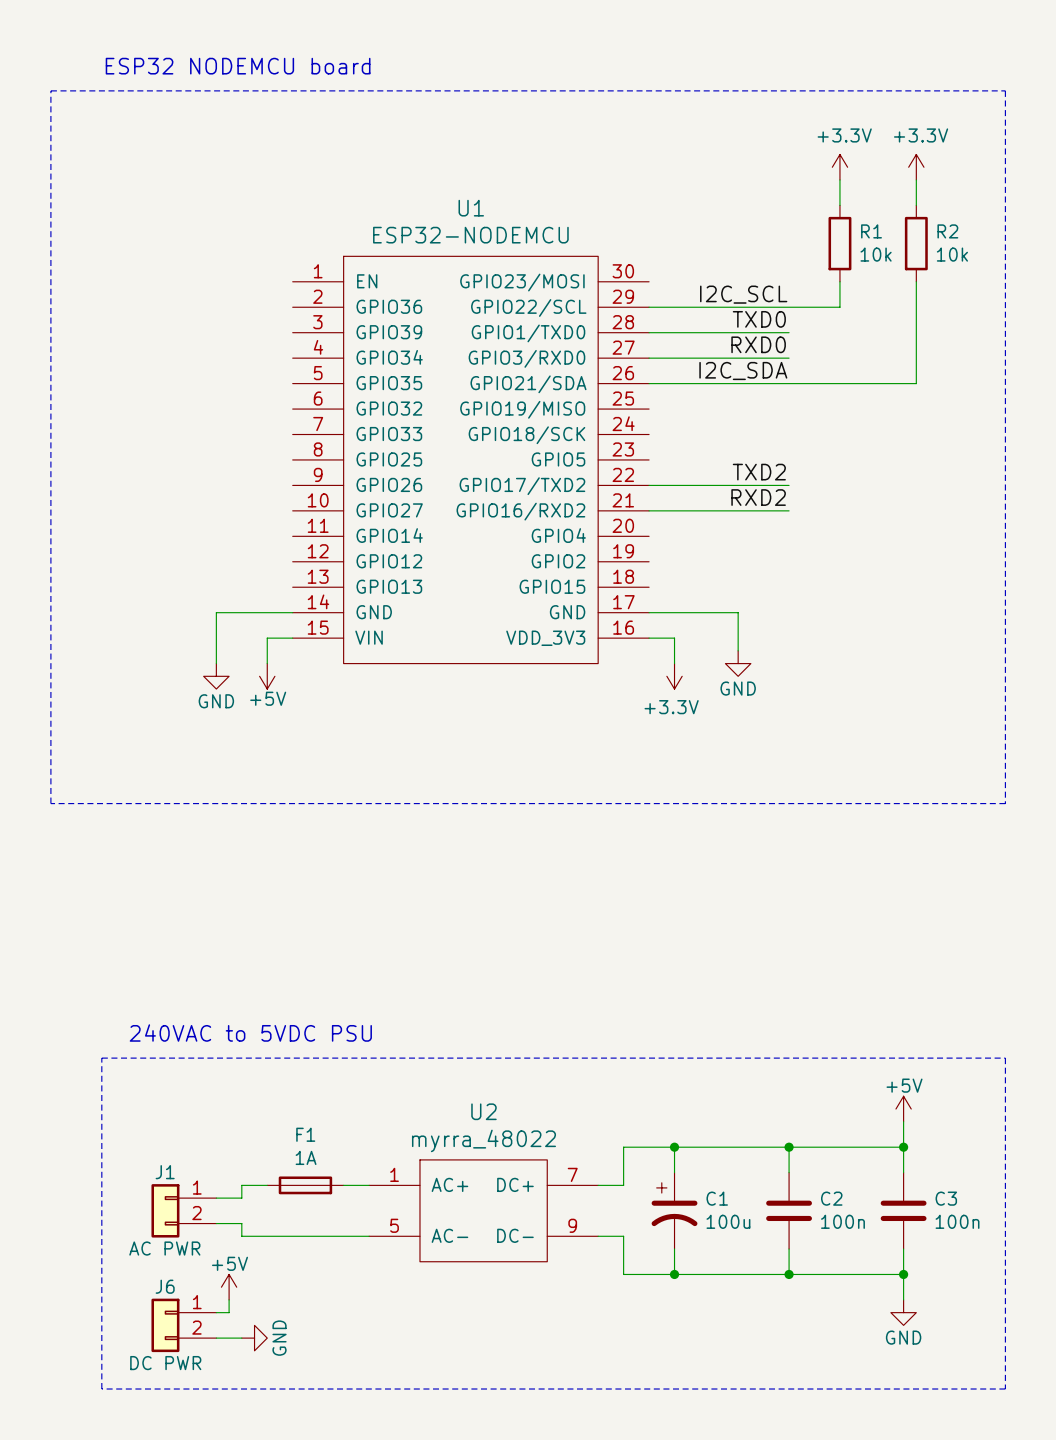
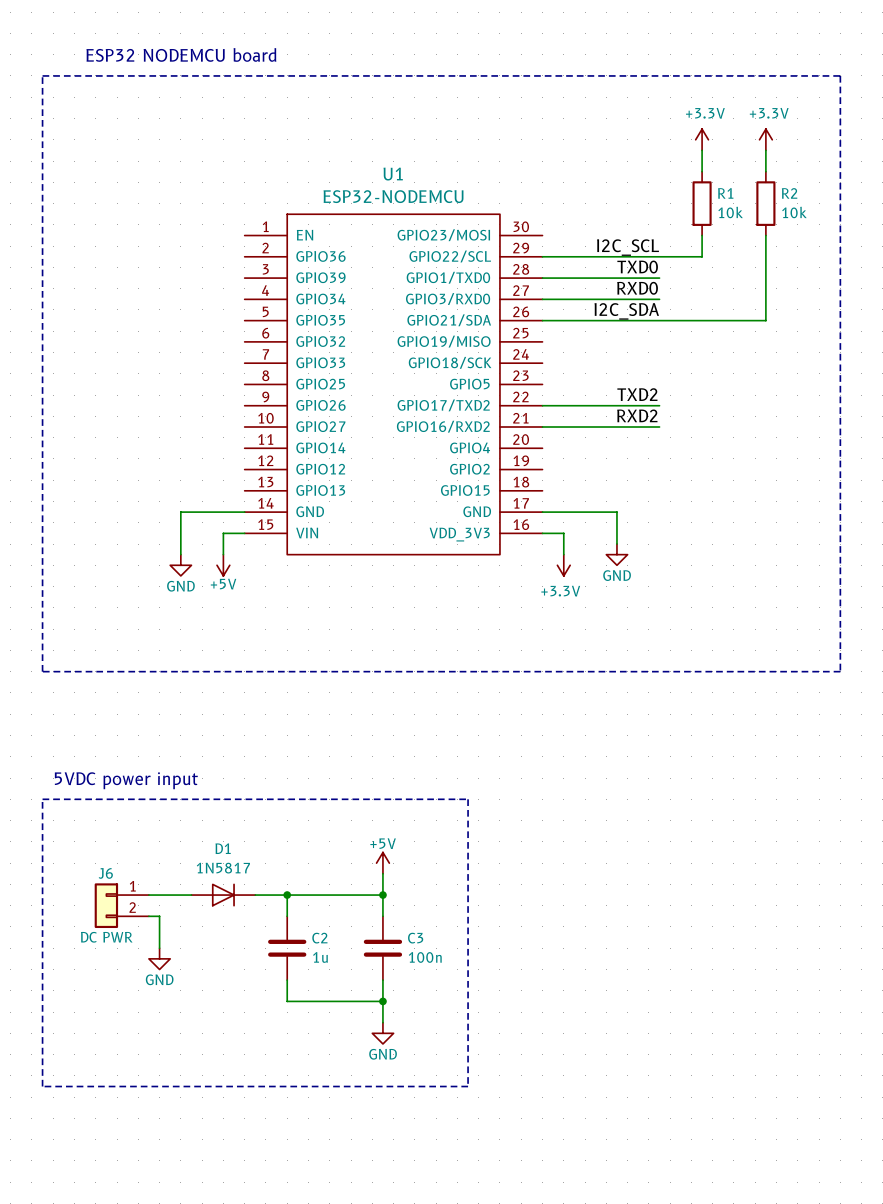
text: none -> 5VDC power input (126, 780)
line: none -> (42, 799) (42, 1086) (468, 1086) (468, 799) (42, 799)
power symbol: none -> +5V (382, 863)
text: 240VAC to 5VDC PSU (250, 1033) -> none
wire: none -> (382, 873) (382, 916)
line: (101, 1058) (101, 1389) (1005, 1389) (1005, 1058) (101, 1058) -> none
wire: none -> (148, 895) (191, 895)
D1: none -> 1N5817 (223, 895)
wire: none -> (255, 895) (382, 895)
wire: none -> (287, 895) (287, 916)
junction: none -> (287, 895)
junction: none -> (382, 895)
wire: none -> (148, 916) (159, 916) (159, 948)
power symbol: +5V (903, 1109) -> none
wire: (903, 1121) (903, 1172) -> none
power symbol: none -> GND (159, 958)
wire: (674, 1147) (674, 1172) -> none
junction: (674, 1147) -> none
wire: (789, 1147) (789, 1172) -> none
junction: (789, 1147) -> none
wire: (903, 1147) (623, 1147) (623, 1185) (598, 1185) -> none
junction: (903, 1147) -> none
wire: none -> (287, 980) (287, 1001) (382, 1001)
wire: none -> (382, 980) (382, 1022)
wire: (267, 1185) (241, 1185) (241, 1198) (216, 1198) -> none
F1: 1A (305, 1185) -> none
wire: (343, 1185) (369, 1185) -> none
junction: none -> (382, 1001)
J1: AC PWR (183, 1210) -> none
U2: myrra_48022 (483, 1210) -> none
C1: 100u (674, 1210) -> none
C2 position: (789, 1210) -> (287, 948)
C3 position: (903, 1210) -> (382, 948)
C2 value: 100n (842, 1221) -> 1u (320, 957)
wire: (216, 1223) (241, 1223) (241, 1236) (369, 1236) -> none
power symbol: none -> GND (382, 1033)
wire: (598, 1236) (623, 1236) (623, 1274) (903, 1274) -> none
wire: (674, 1249) (674, 1274) -> none
wire: (789, 1249) (789, 1274) -> none
wire: (903, 1249) (903, 1299) -> none
junction: (674, 1274) -> none
junction: (789, 1274) -> none
junction: (903, 1274) -> none
power symbol: +5V (229, 1287) -> none
wire: (229, 1299) (229, 1312) (216, 1312) -> none
power symbol: GND (903, 1312) -> none
J6 position: (183, 1325) -> (121, 905)
wire: (216, 1338) (241, 1338) -> none
power symbol: GND (254, 1338) -> none

